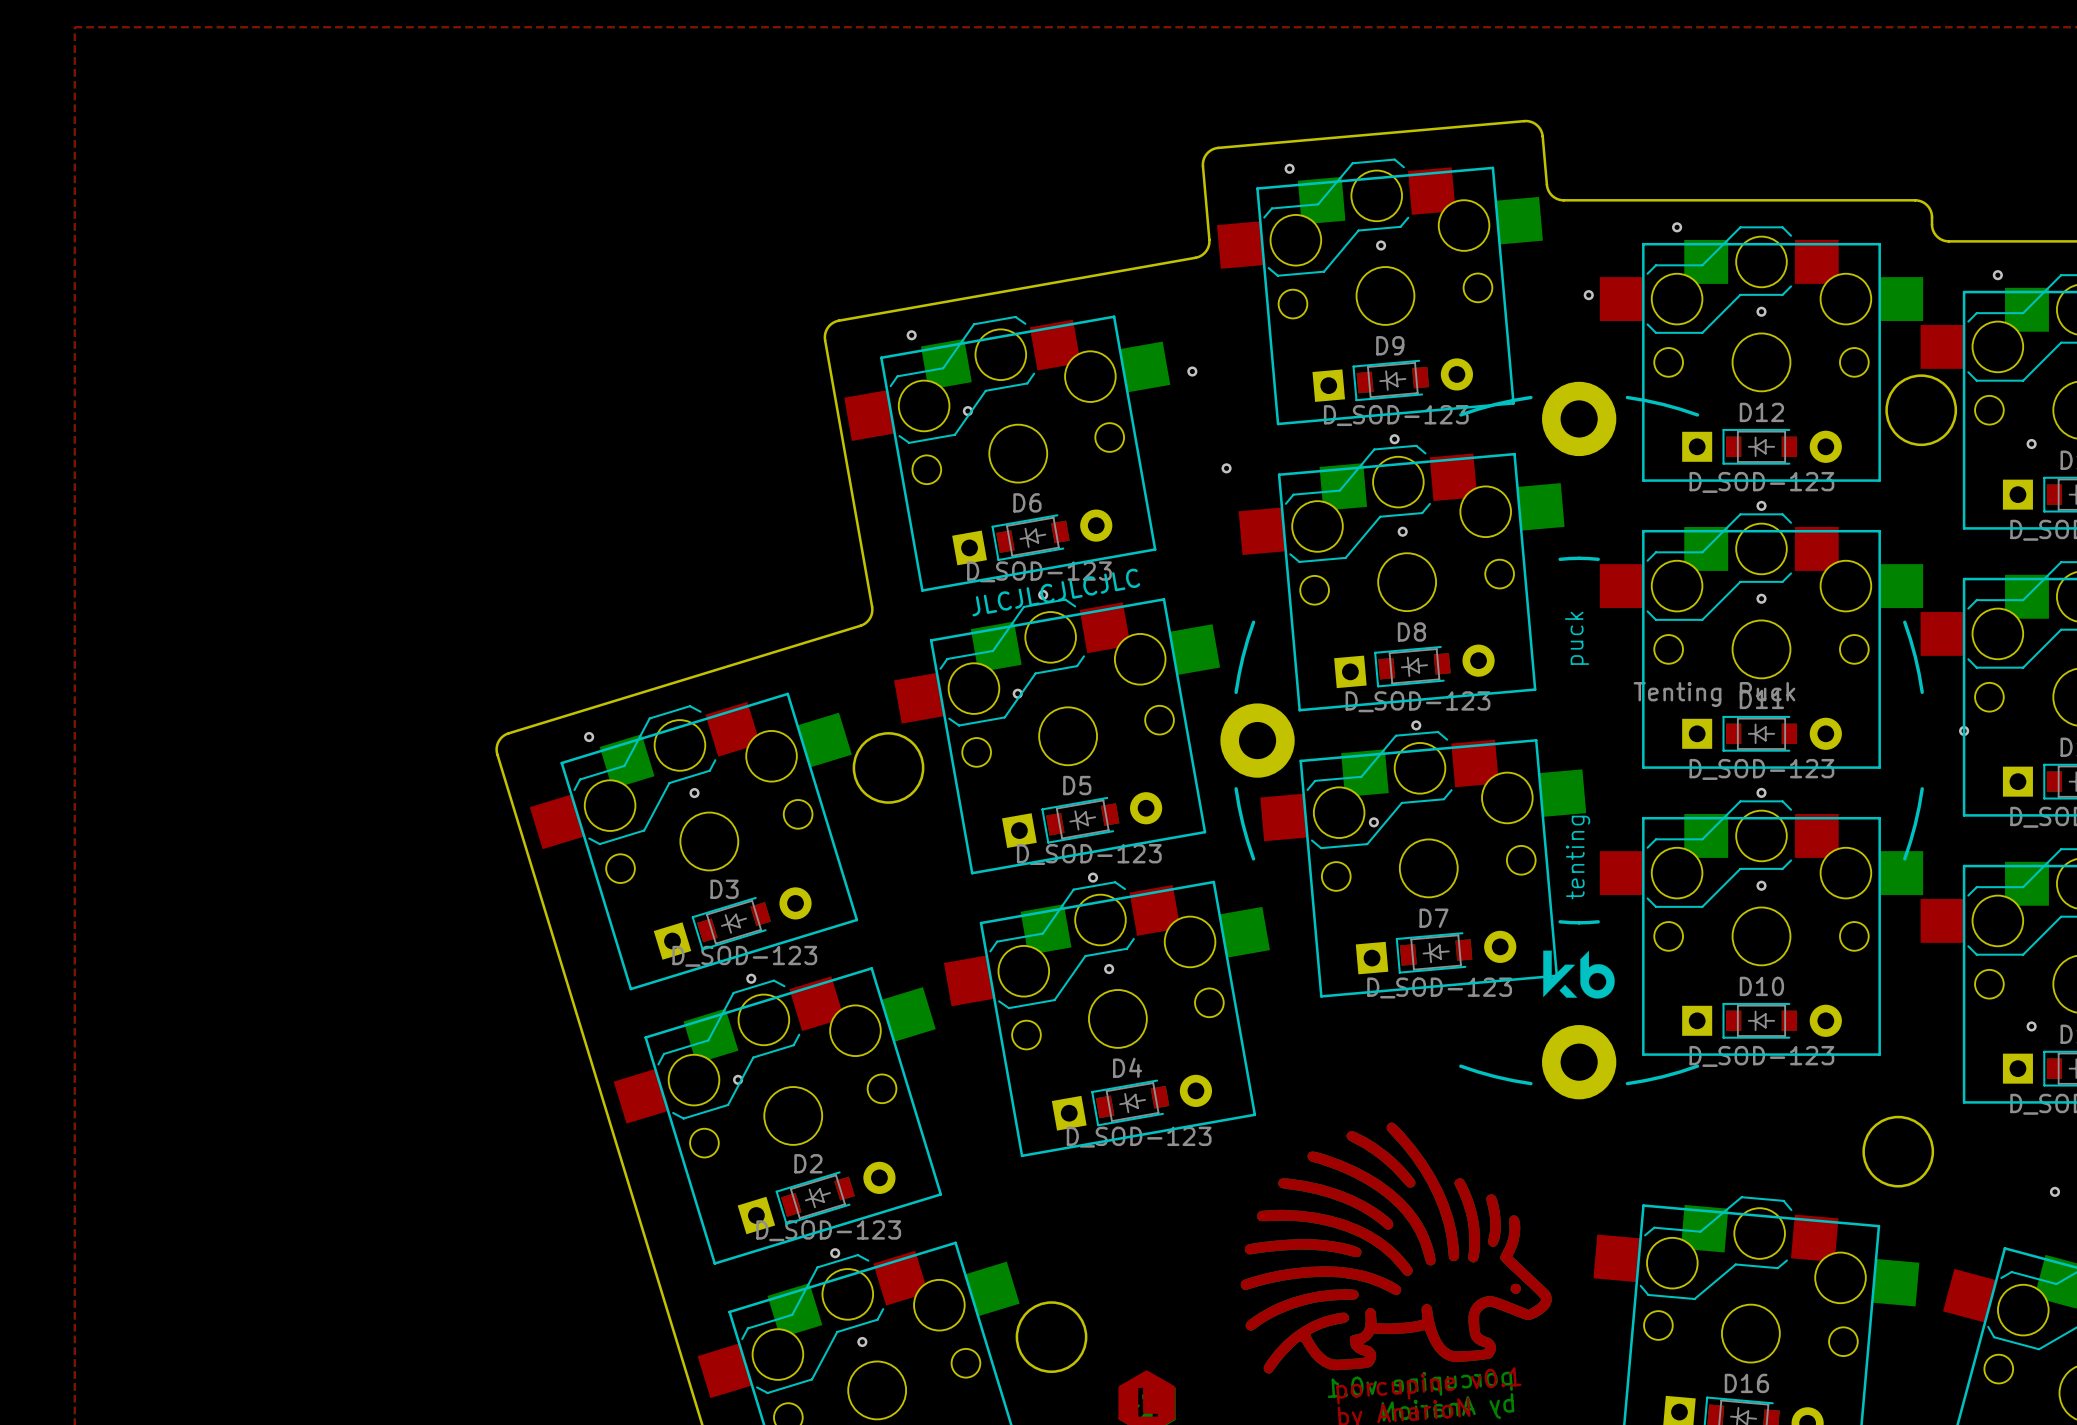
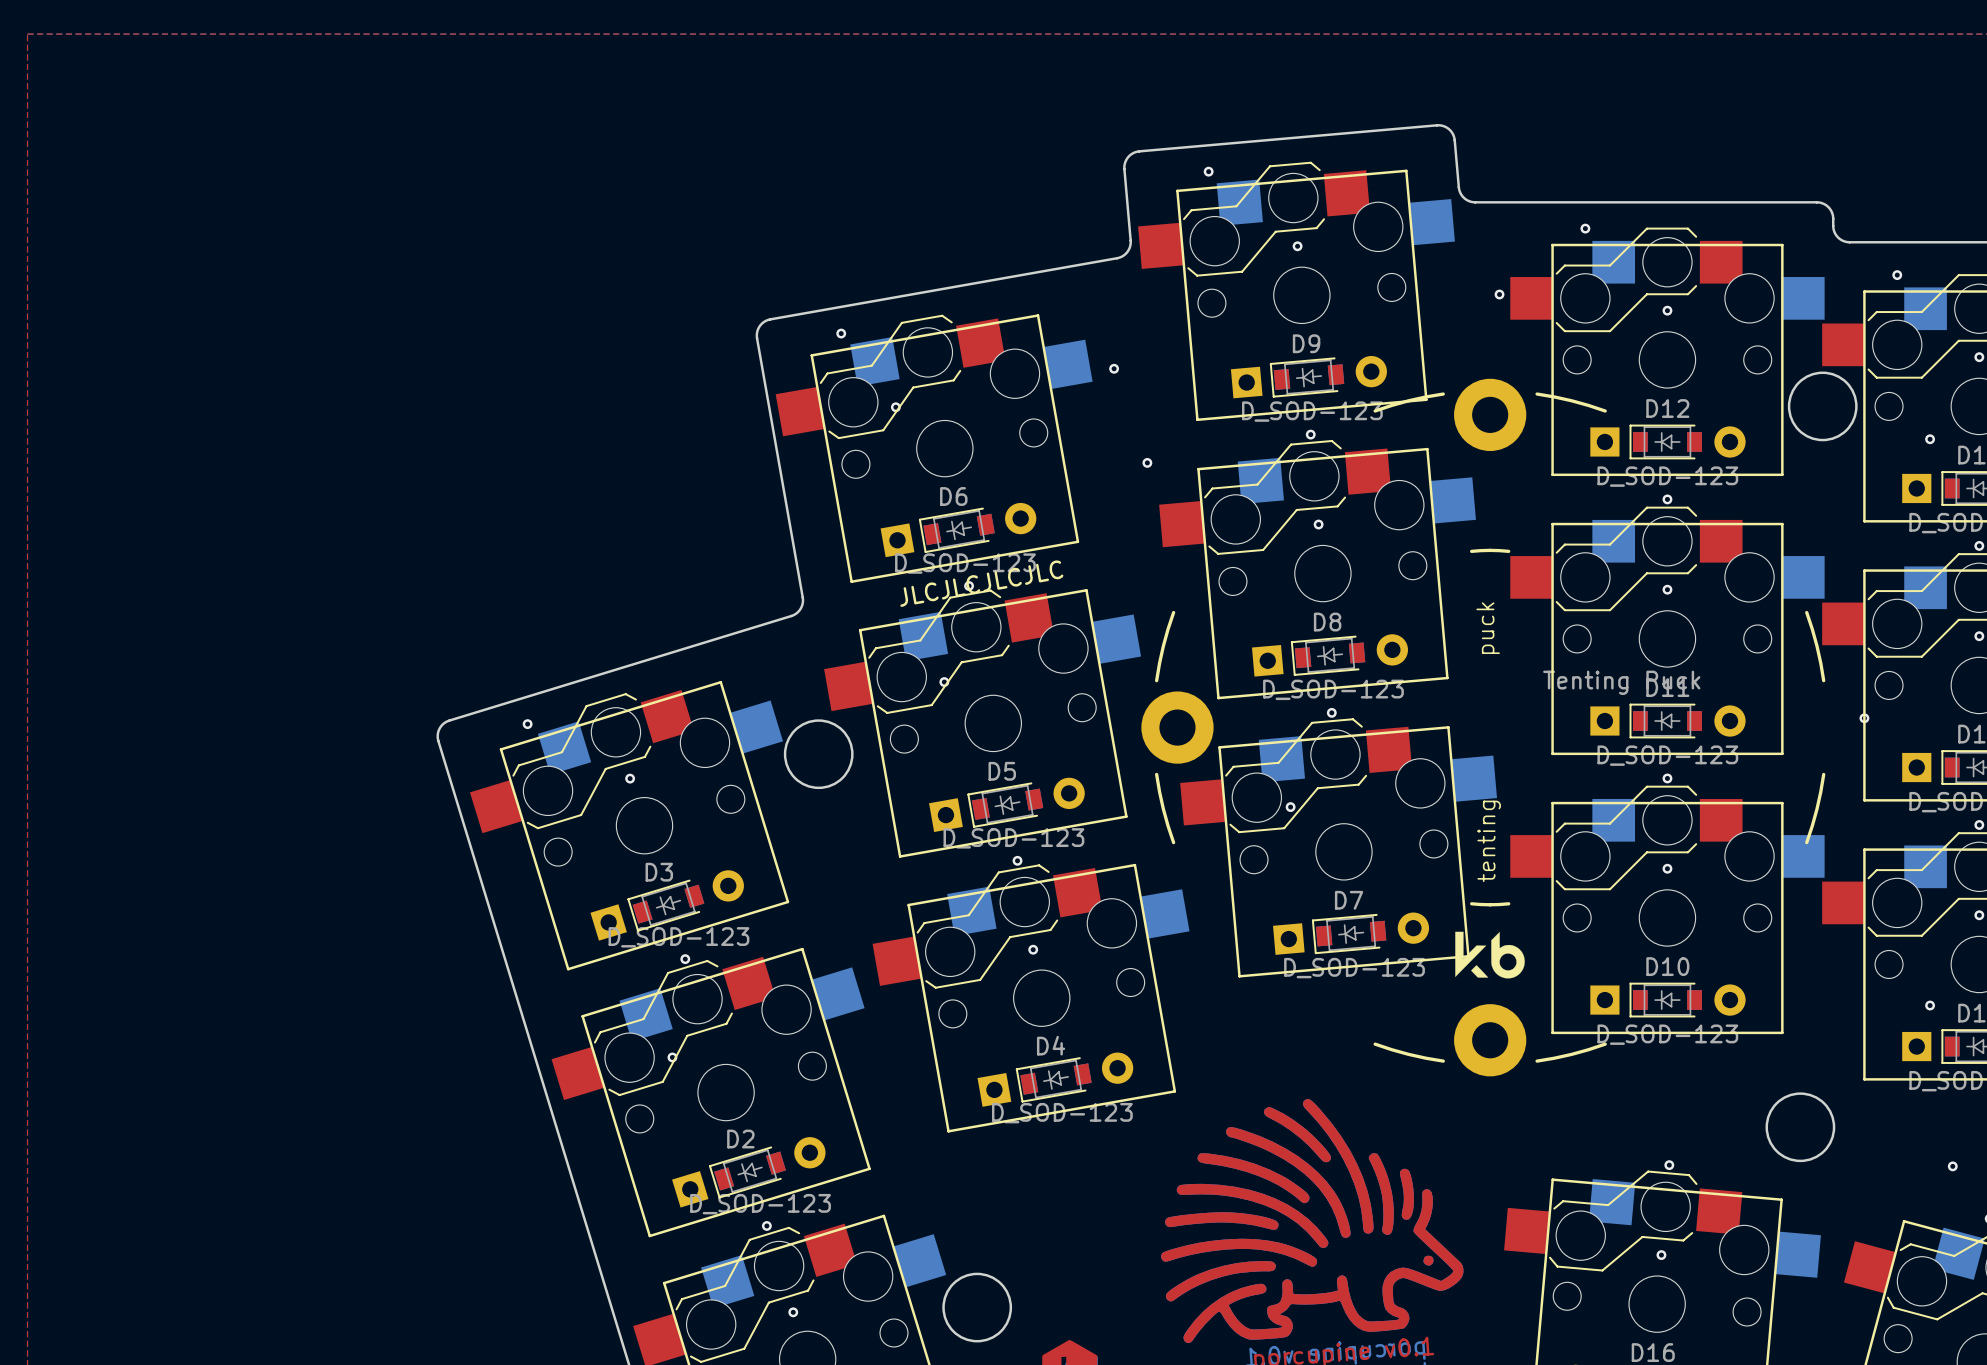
via: none -> (1669, 1165)
via: none -> (1661, 1255)

